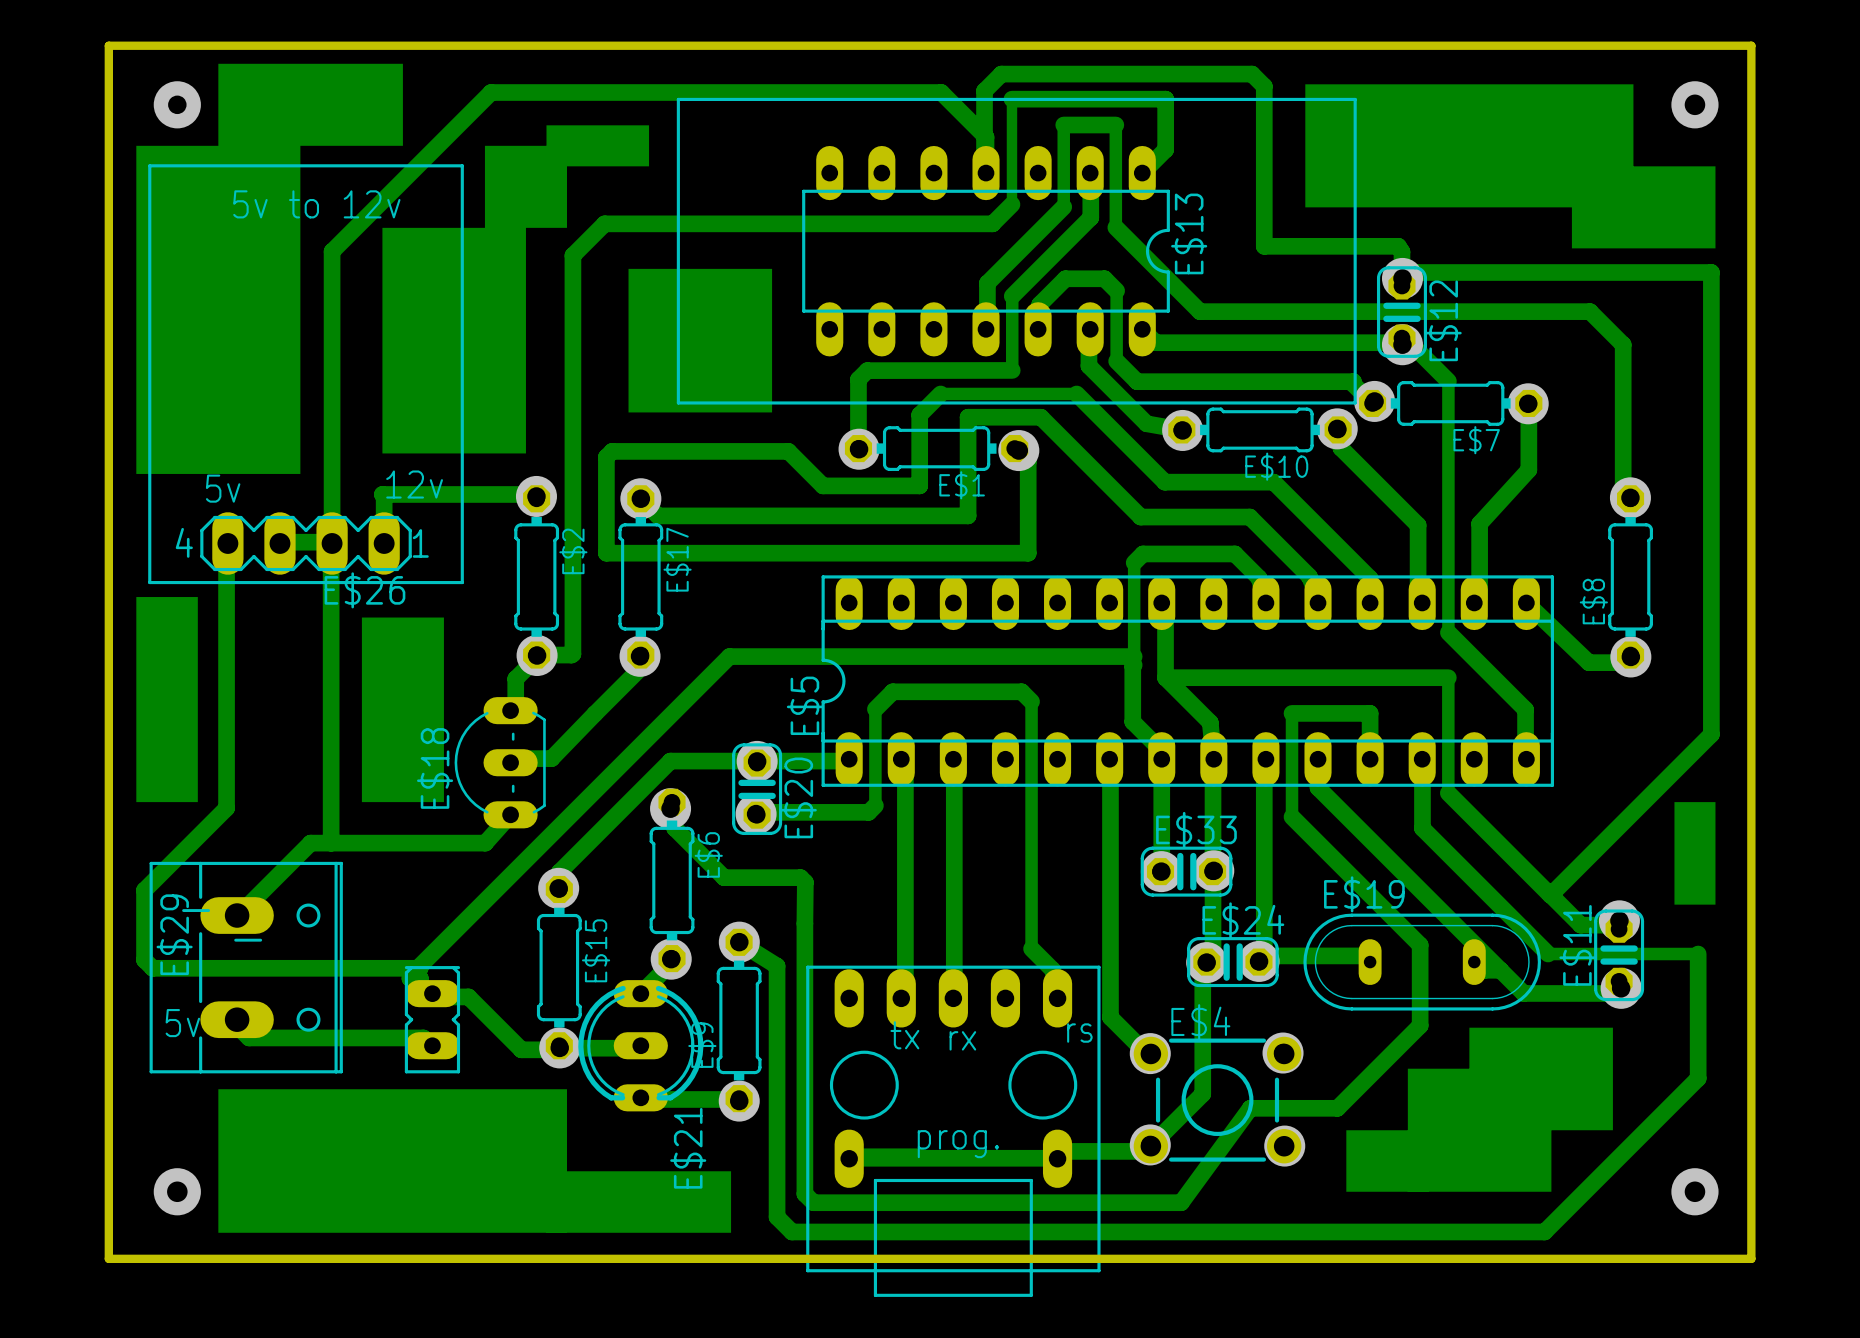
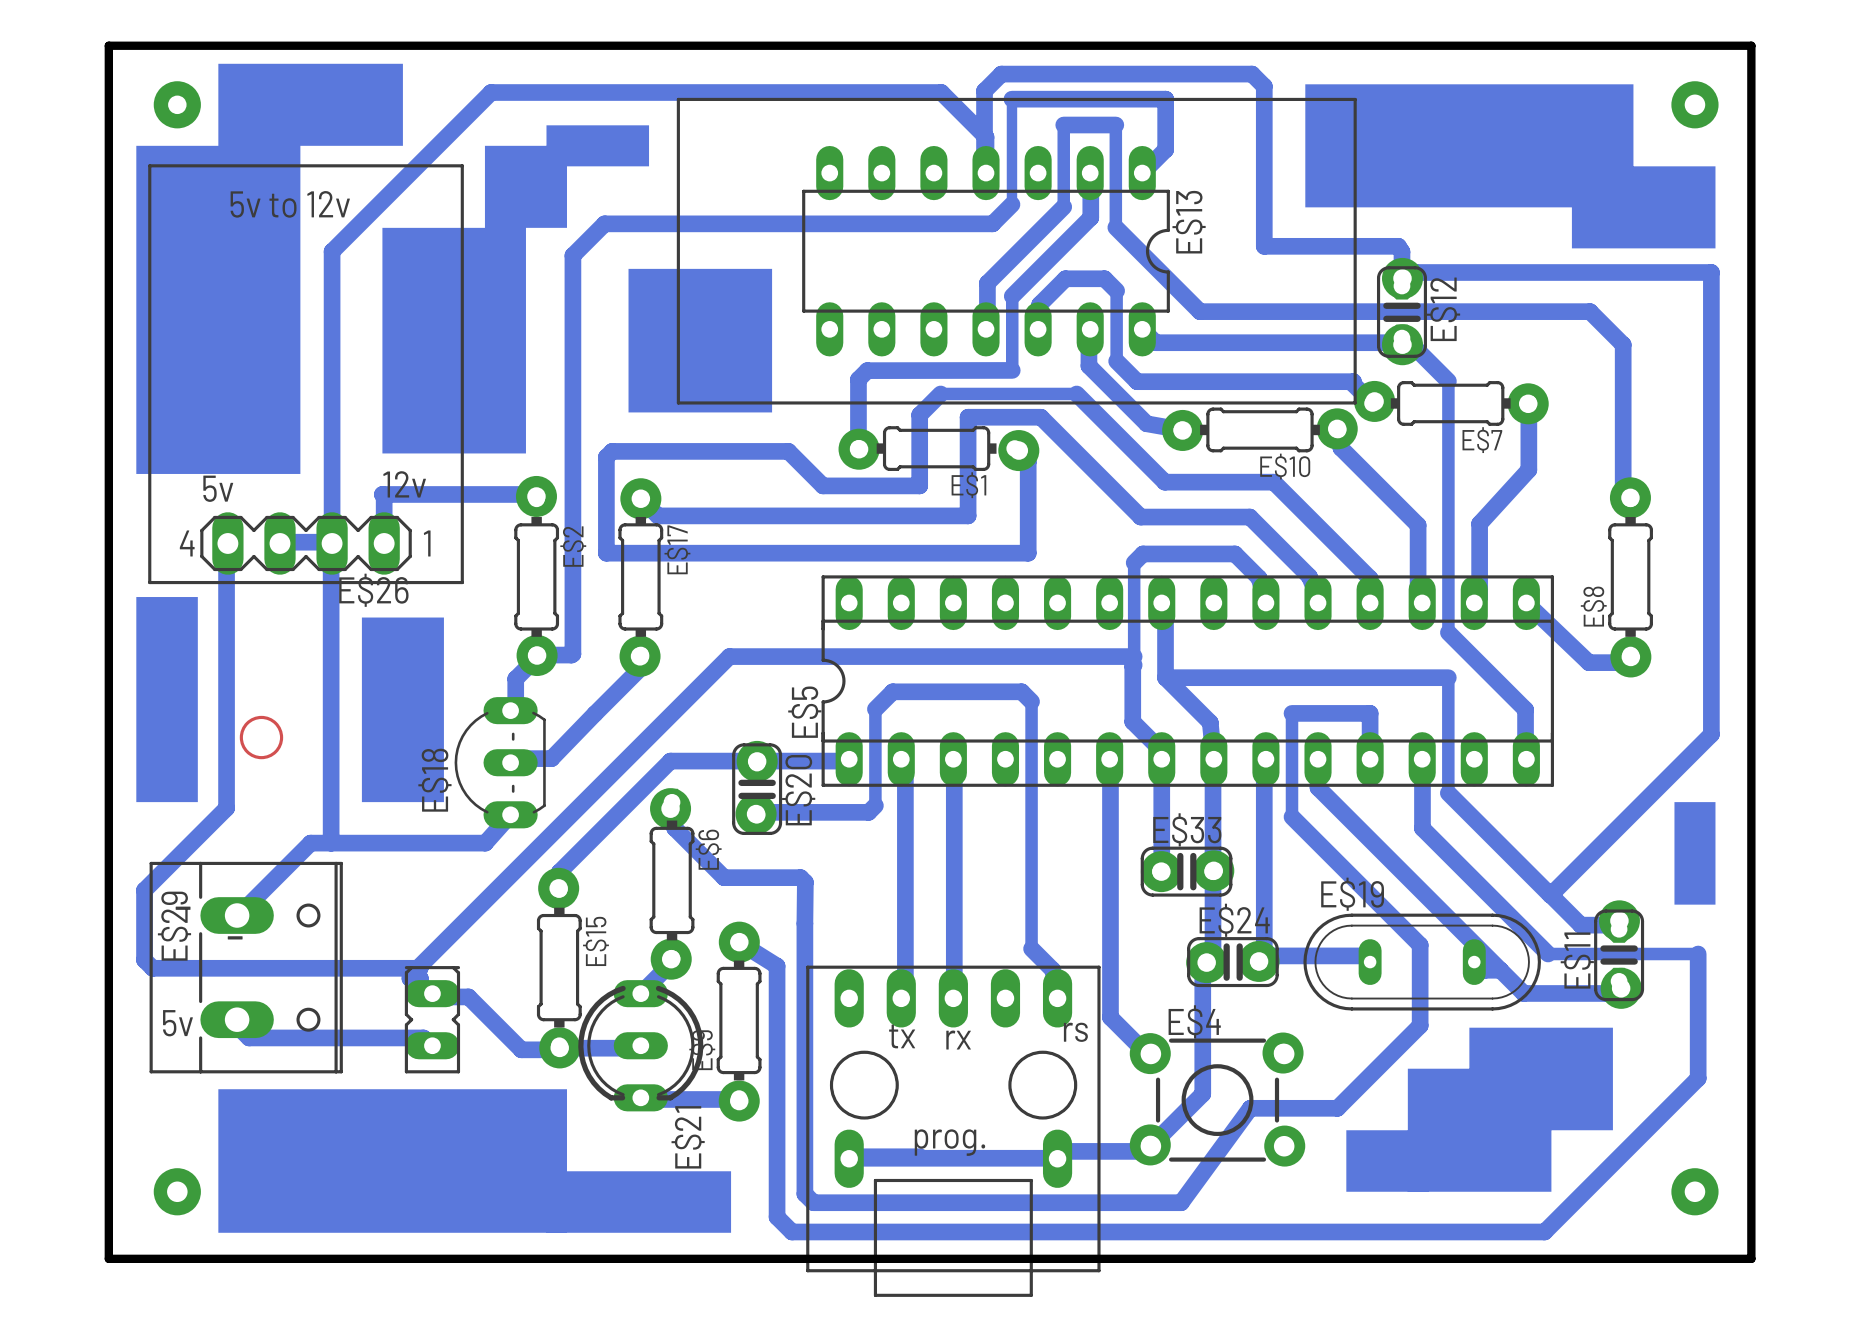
drawing: none -> [239, 715, 284, 760]

